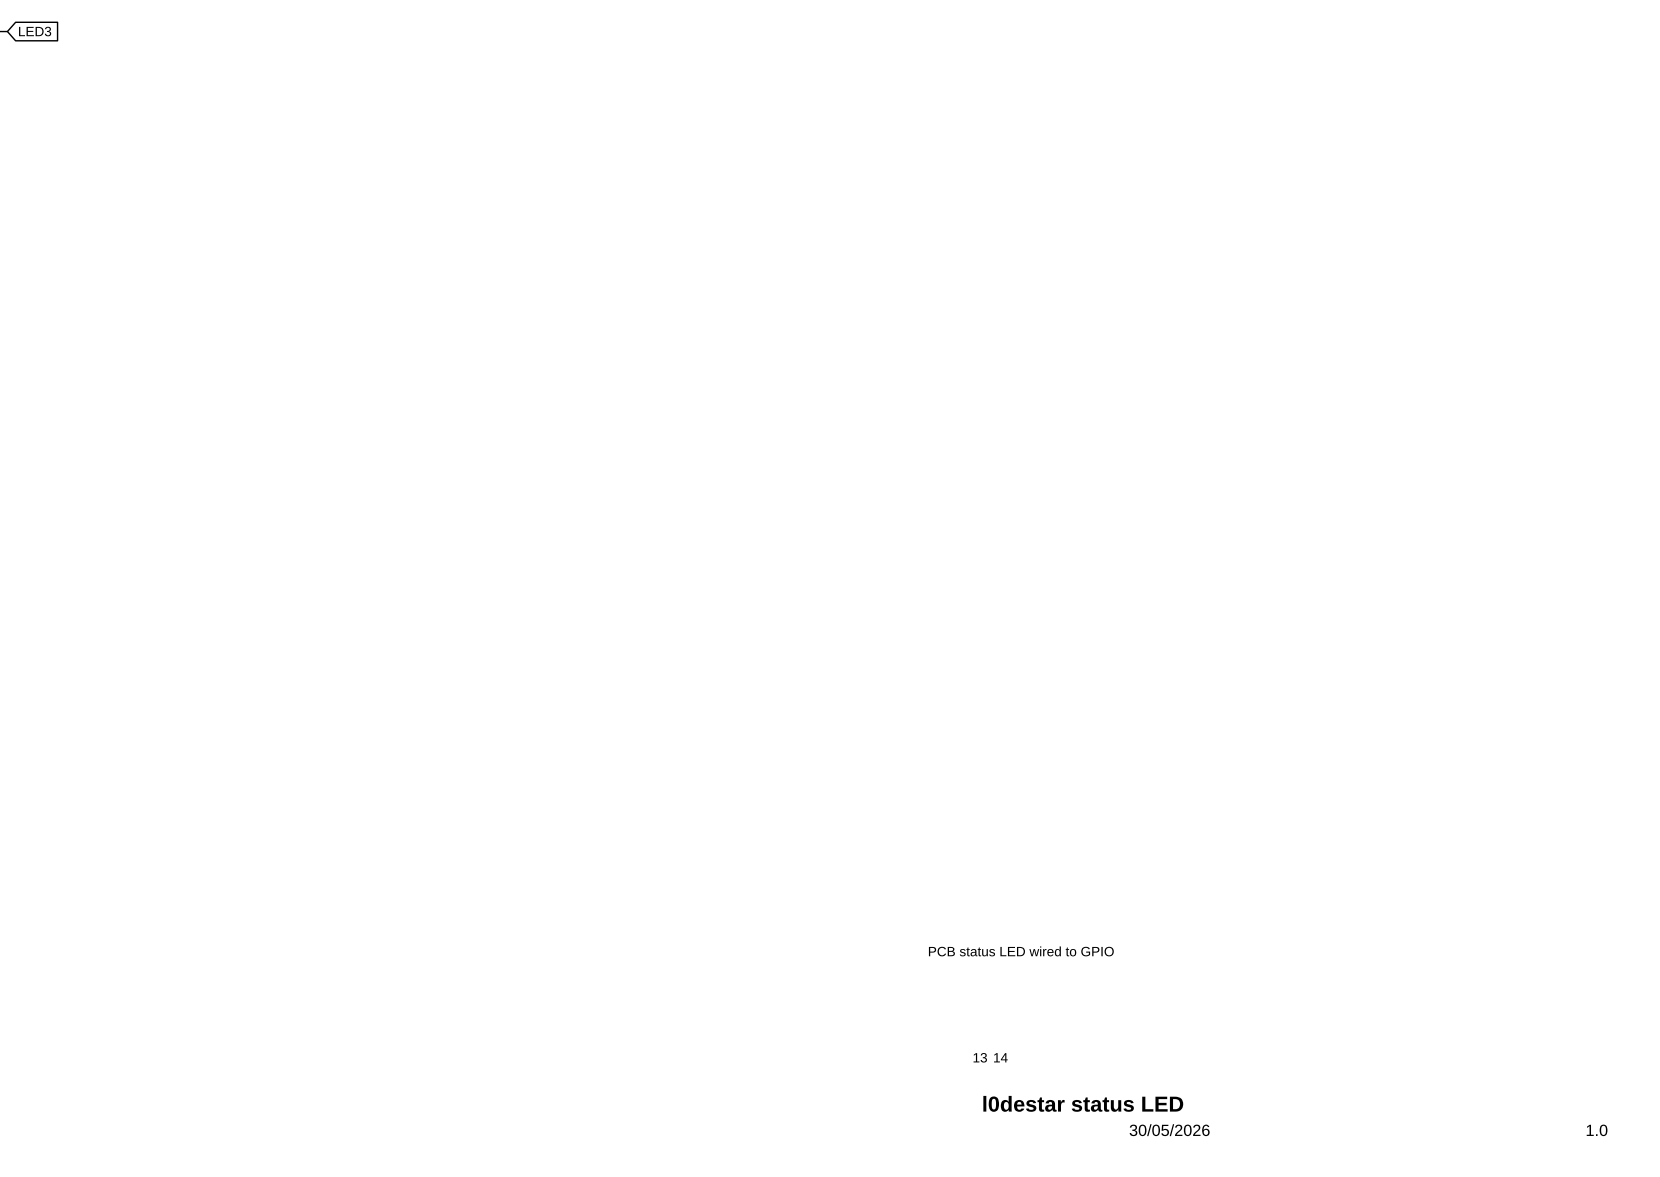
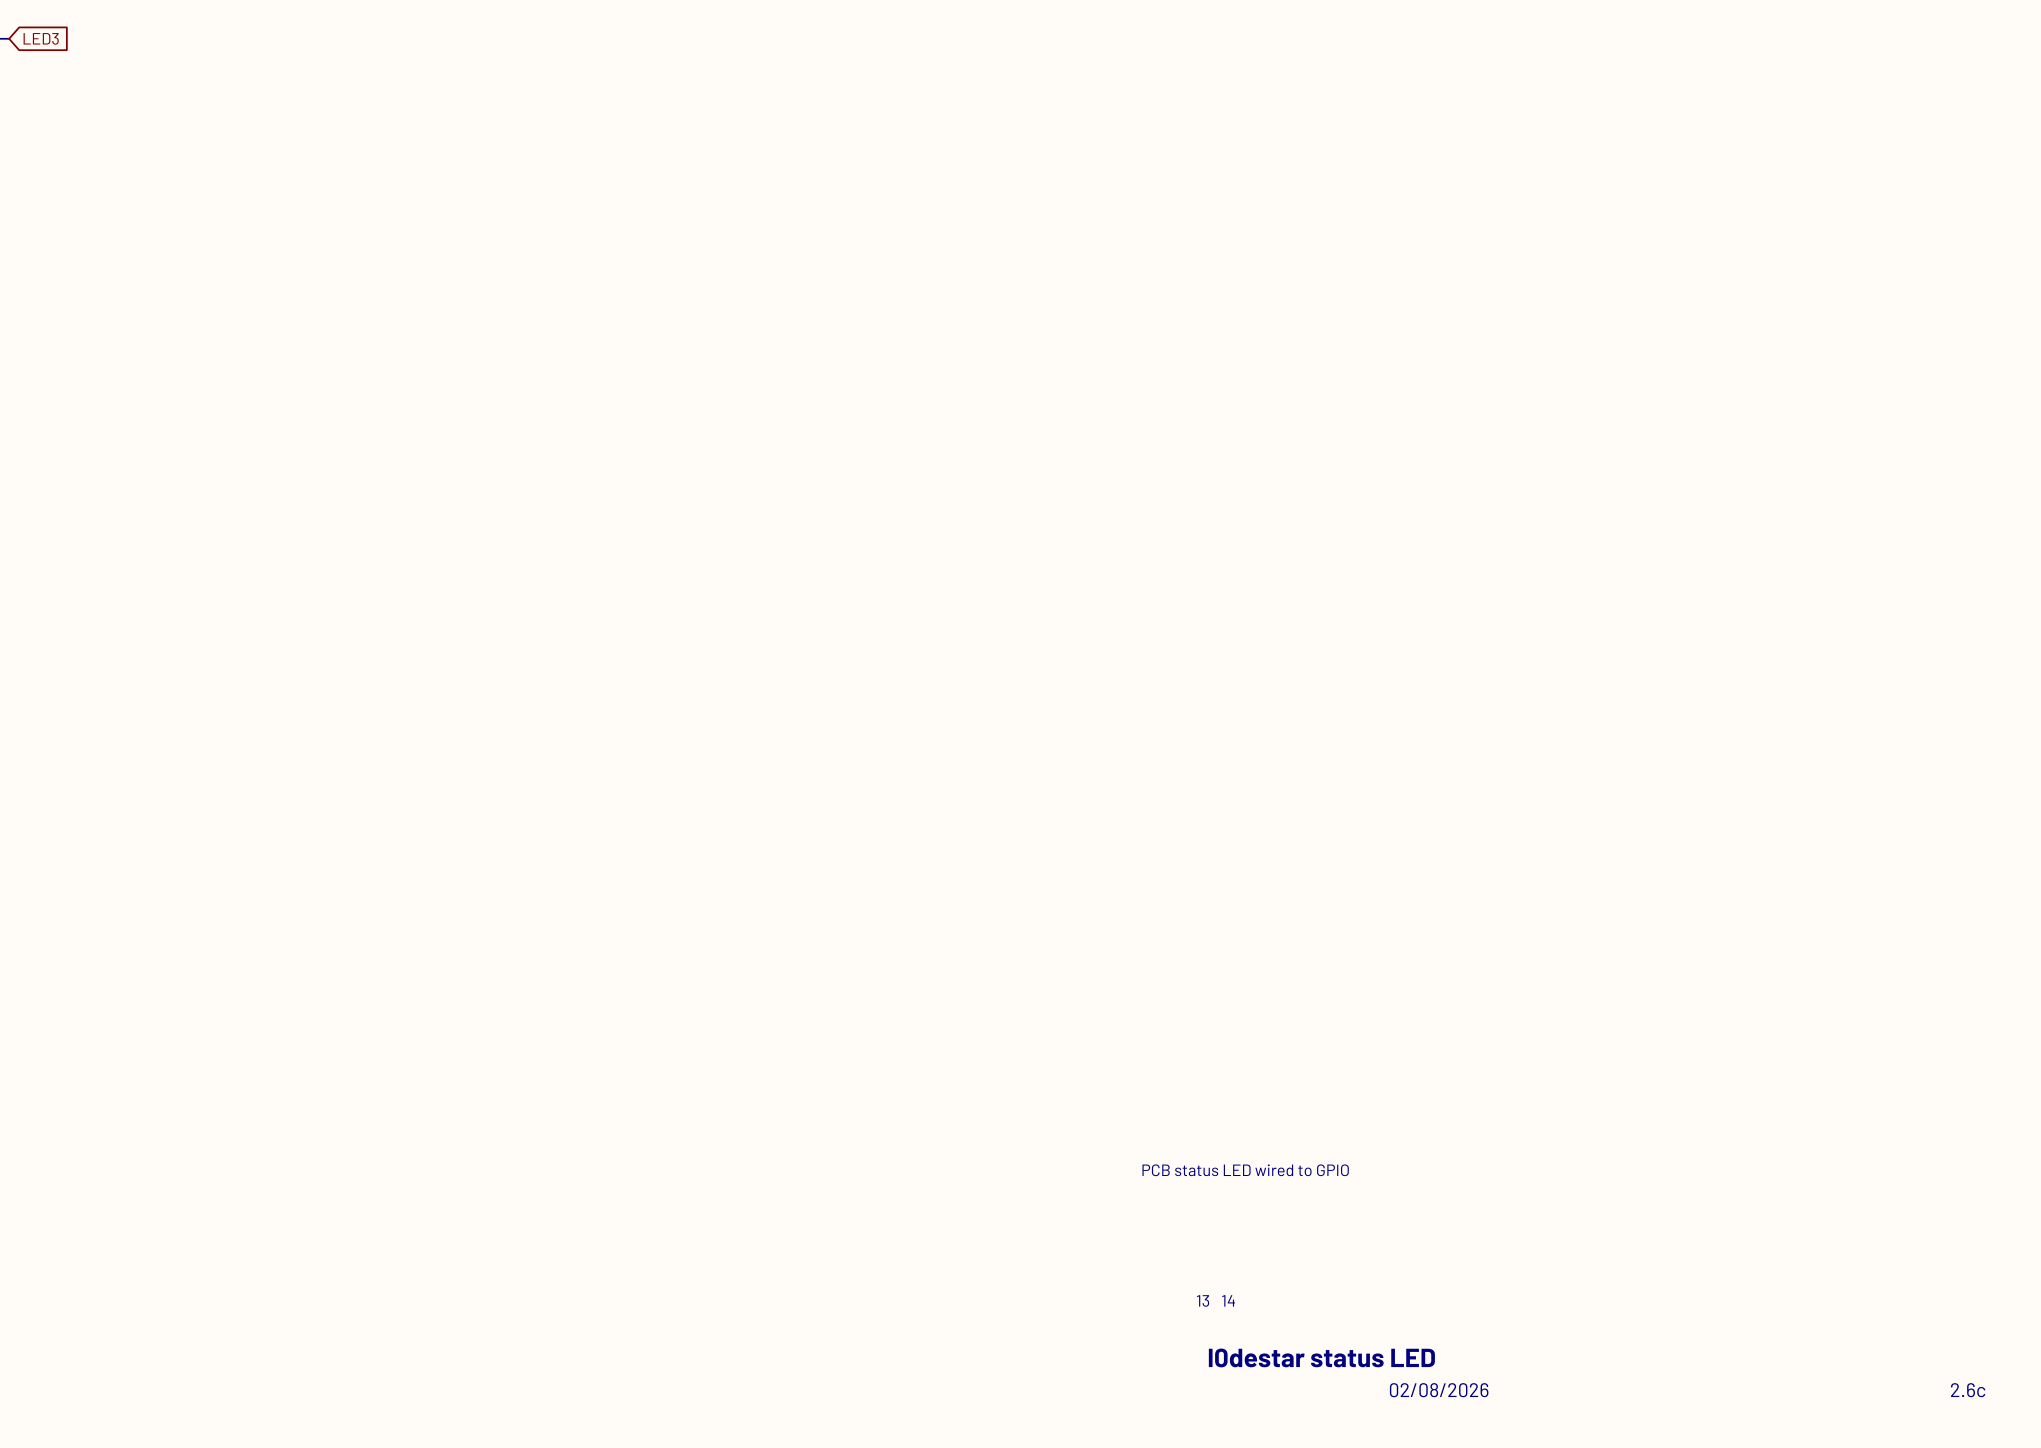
text: 30/05/2026 (1169, 1130) -> 02/08/2026 (1439, 1390)
text: 1.0 (1597, 1130) -> 2.6c (1968, 1390)

